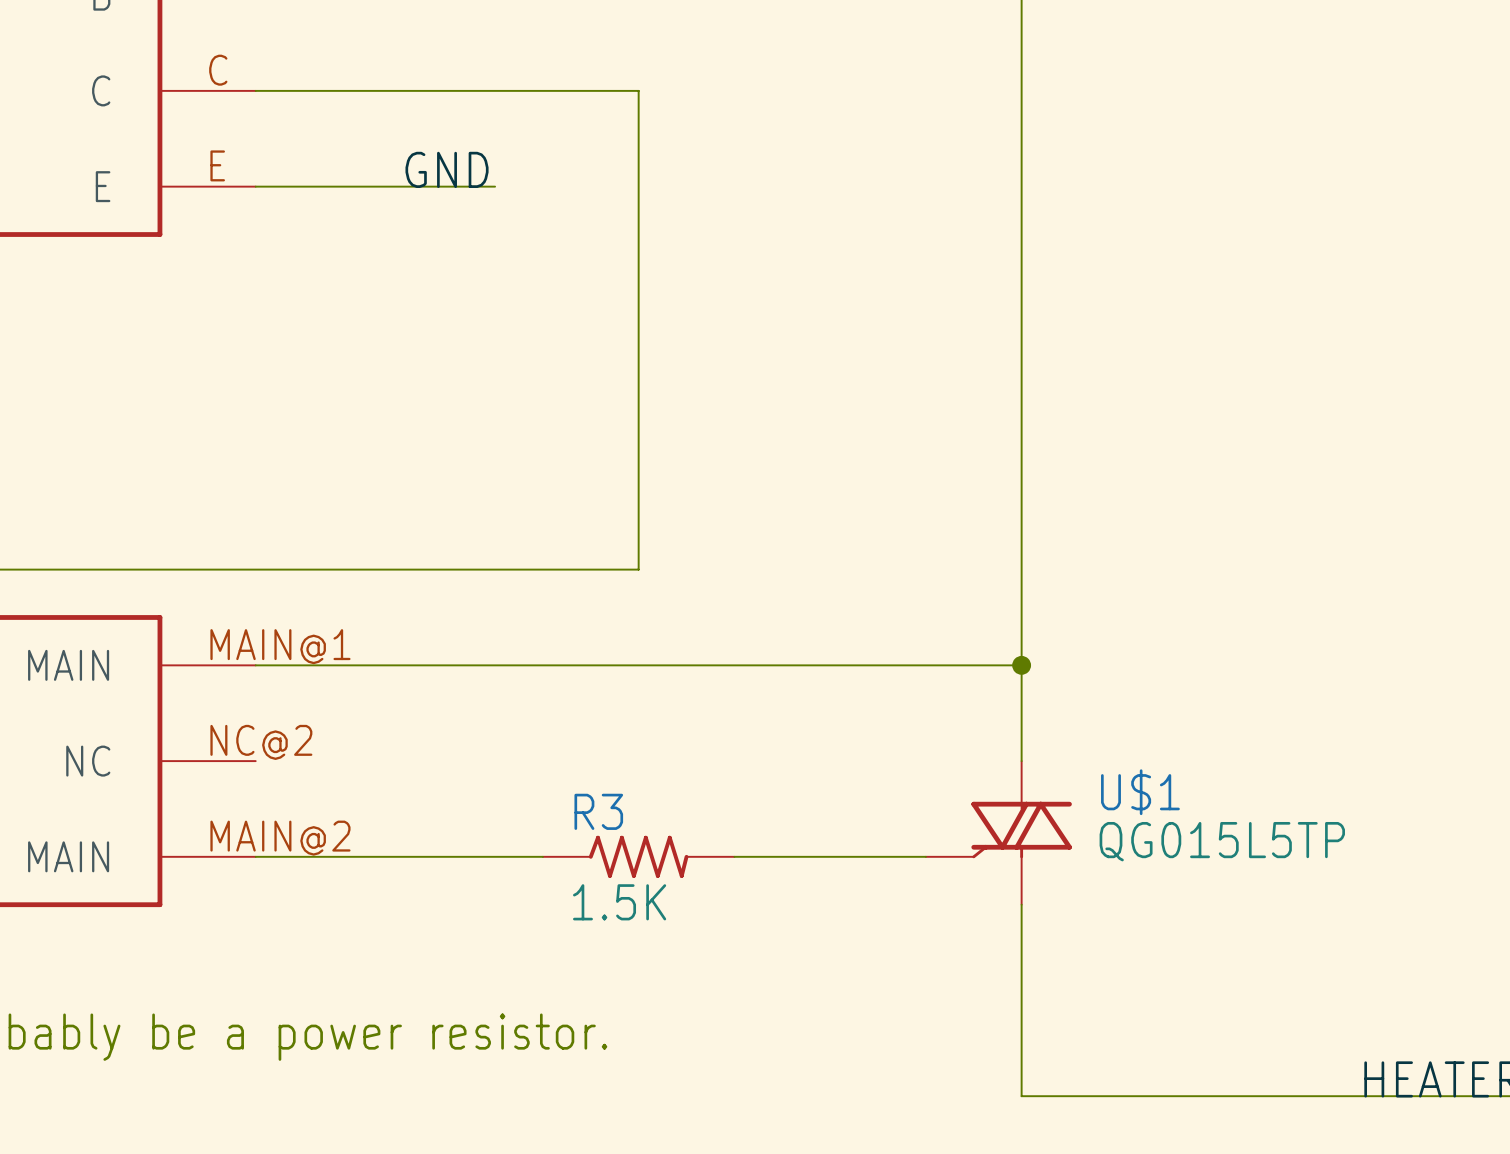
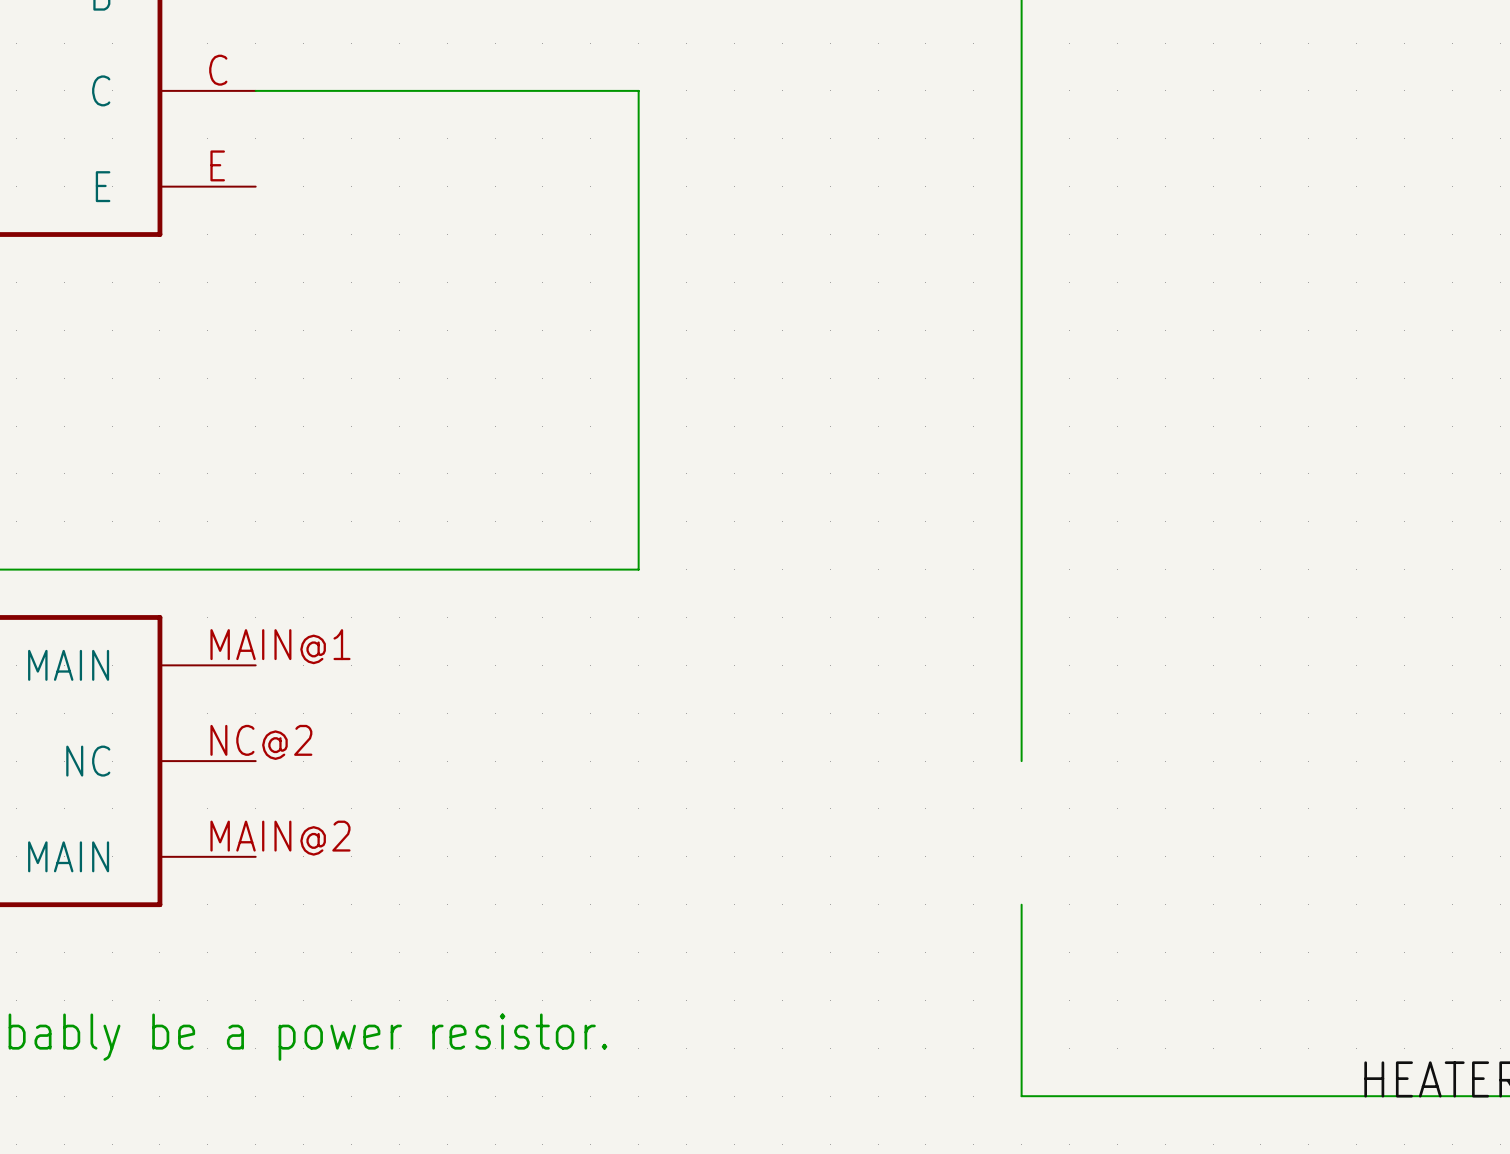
label: GND (447, 169) -> none
wire: (255, 186) (495, 186) -> none
wire: (255, 665) (1021, 665) -> none
junction: (1021, 665) -> none
U$1: QG015L5TP (998, 832) -> none
wire: (255, 856) (542, 856) -> none
R3: 1.5K (638, 856) -> none
wire: (734, 856) (925, 856) -> none

